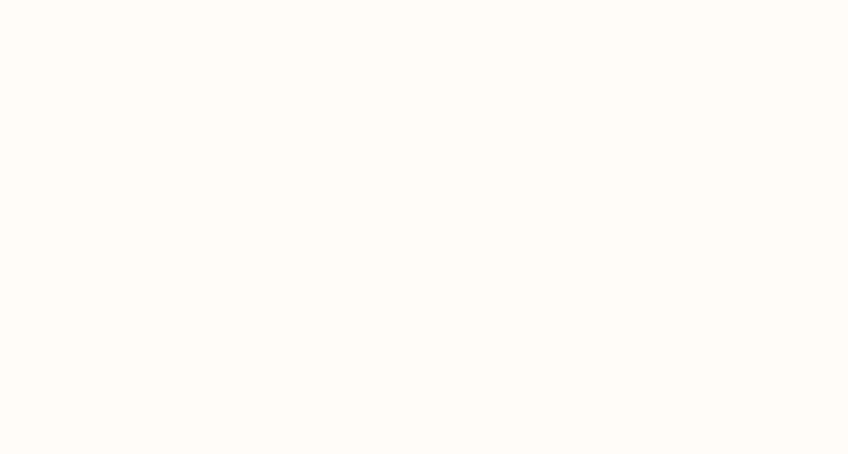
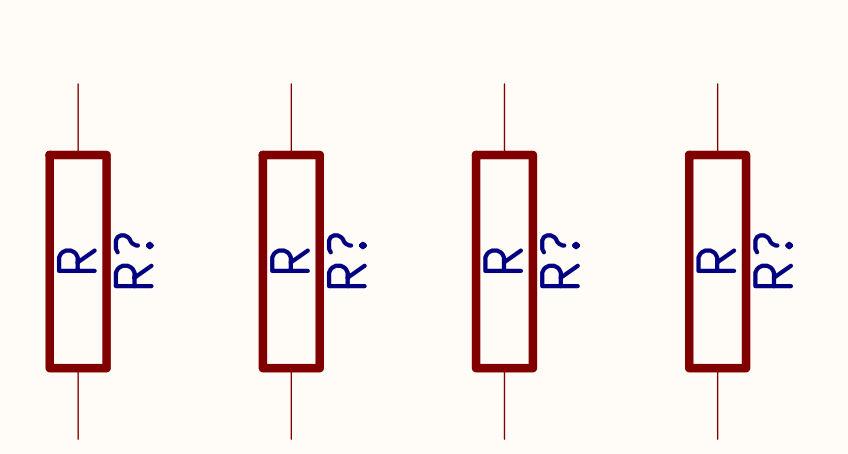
R?: none -> R (78, 261)
R?: none -> R (291, 261)
R?: none -> R (504, 261)
R?: none -> R (717, 261)

